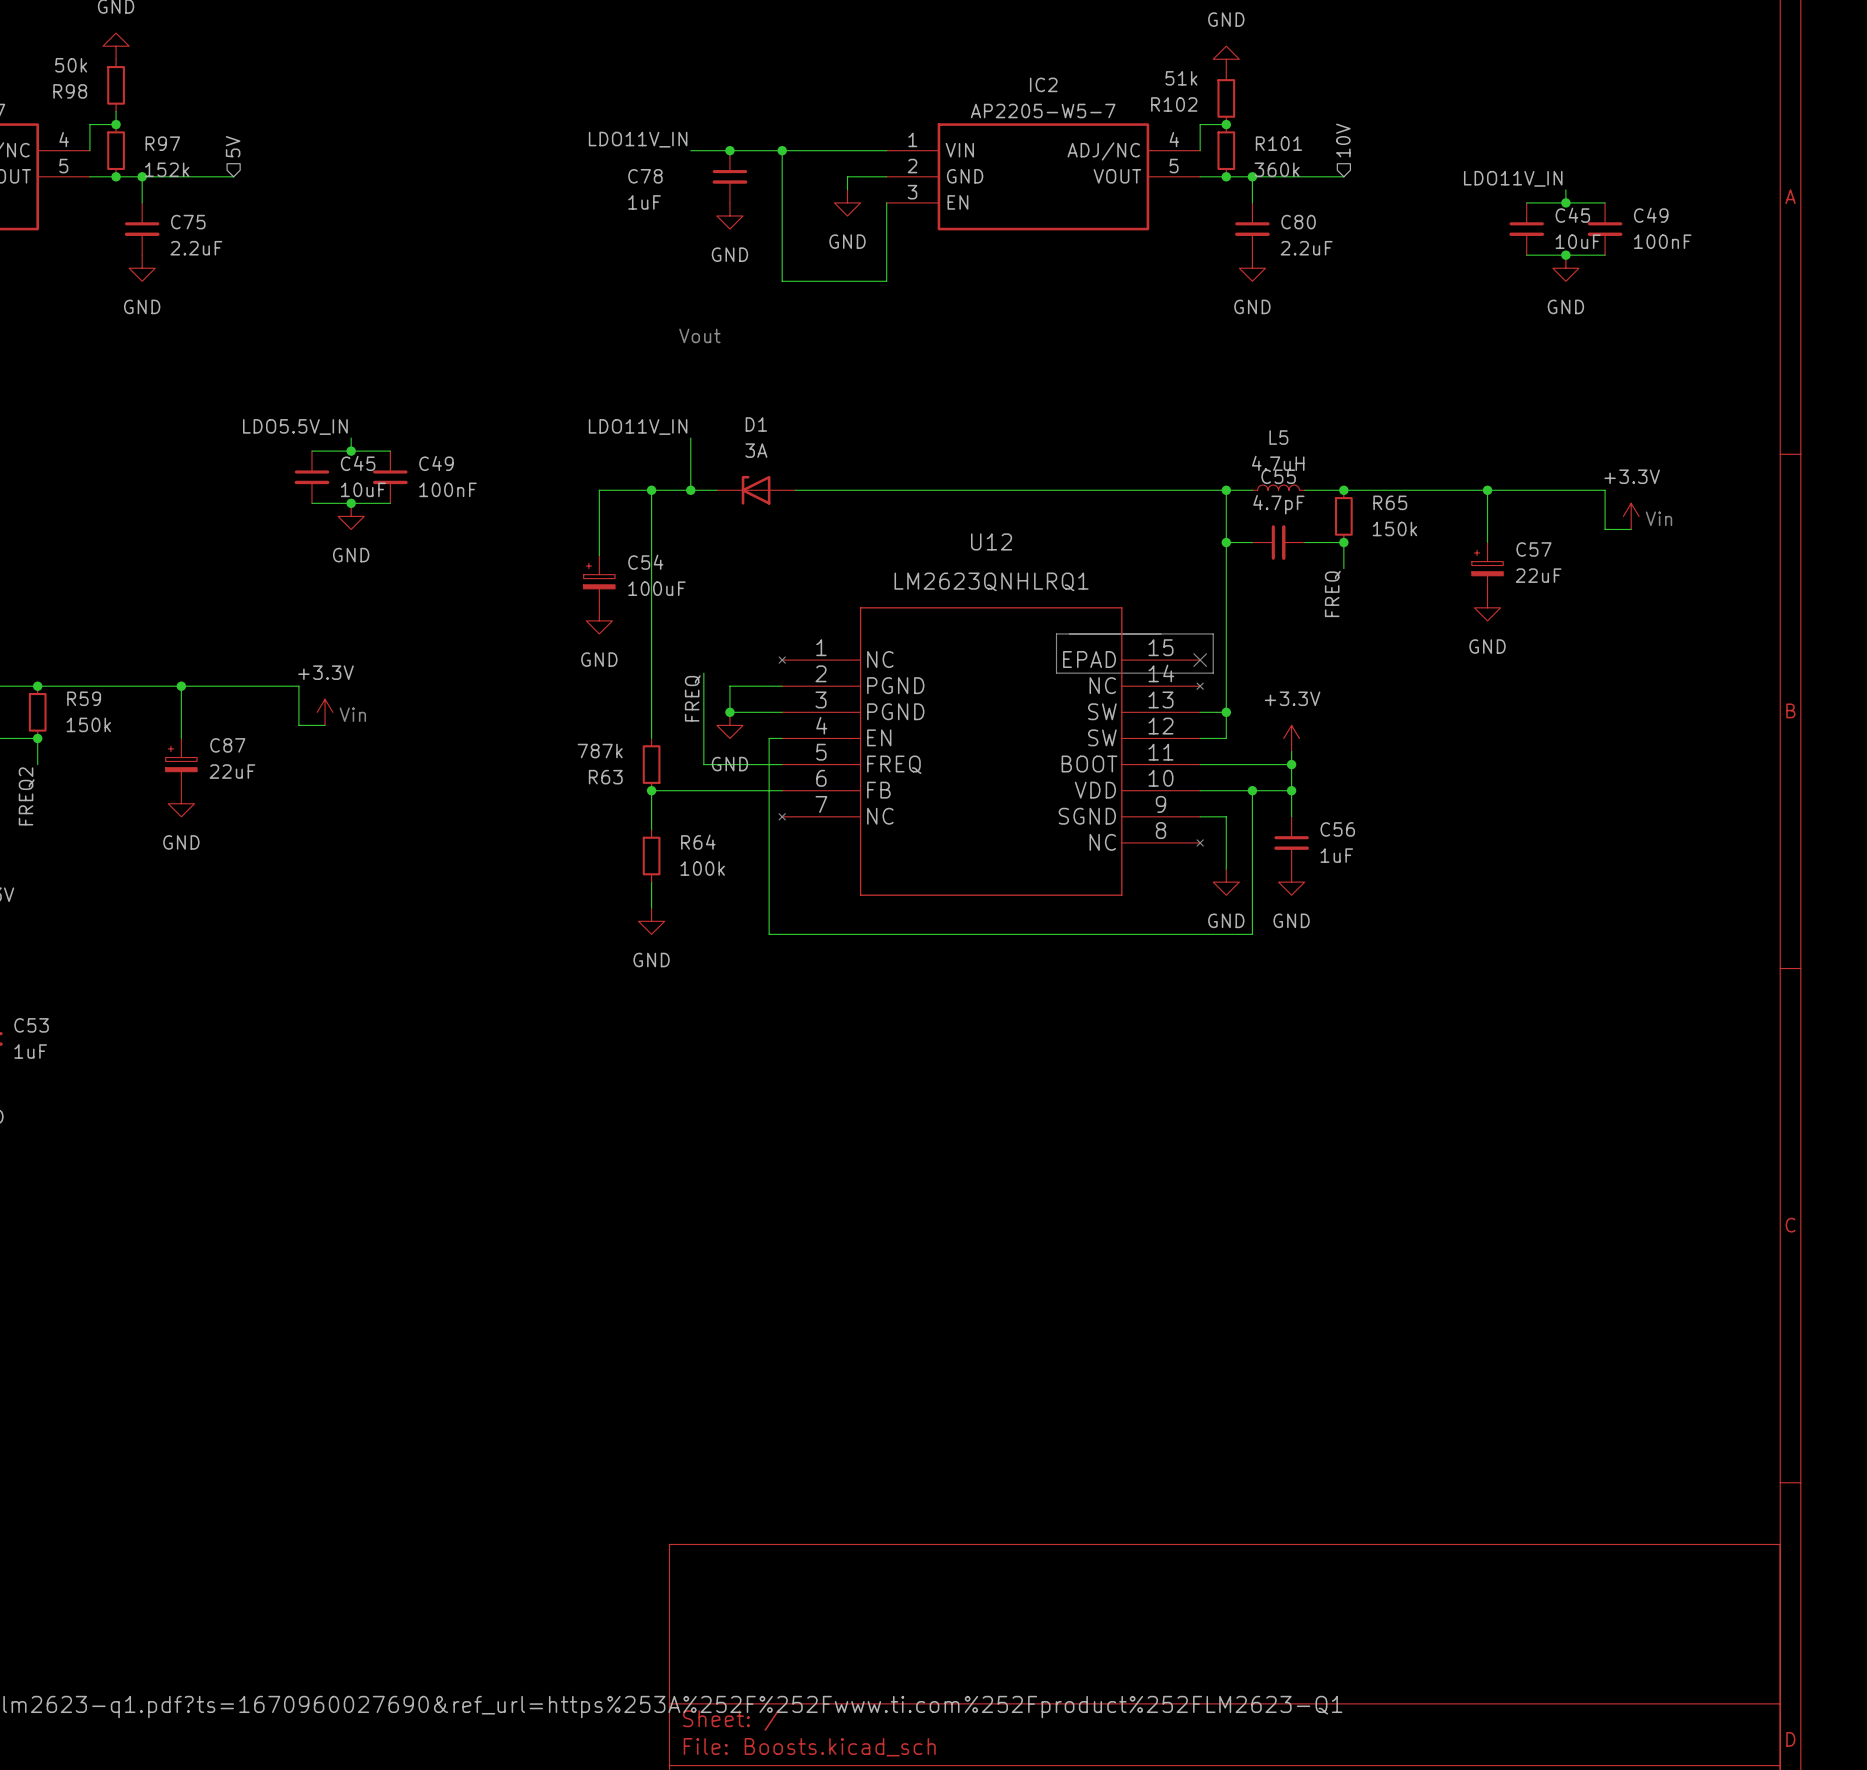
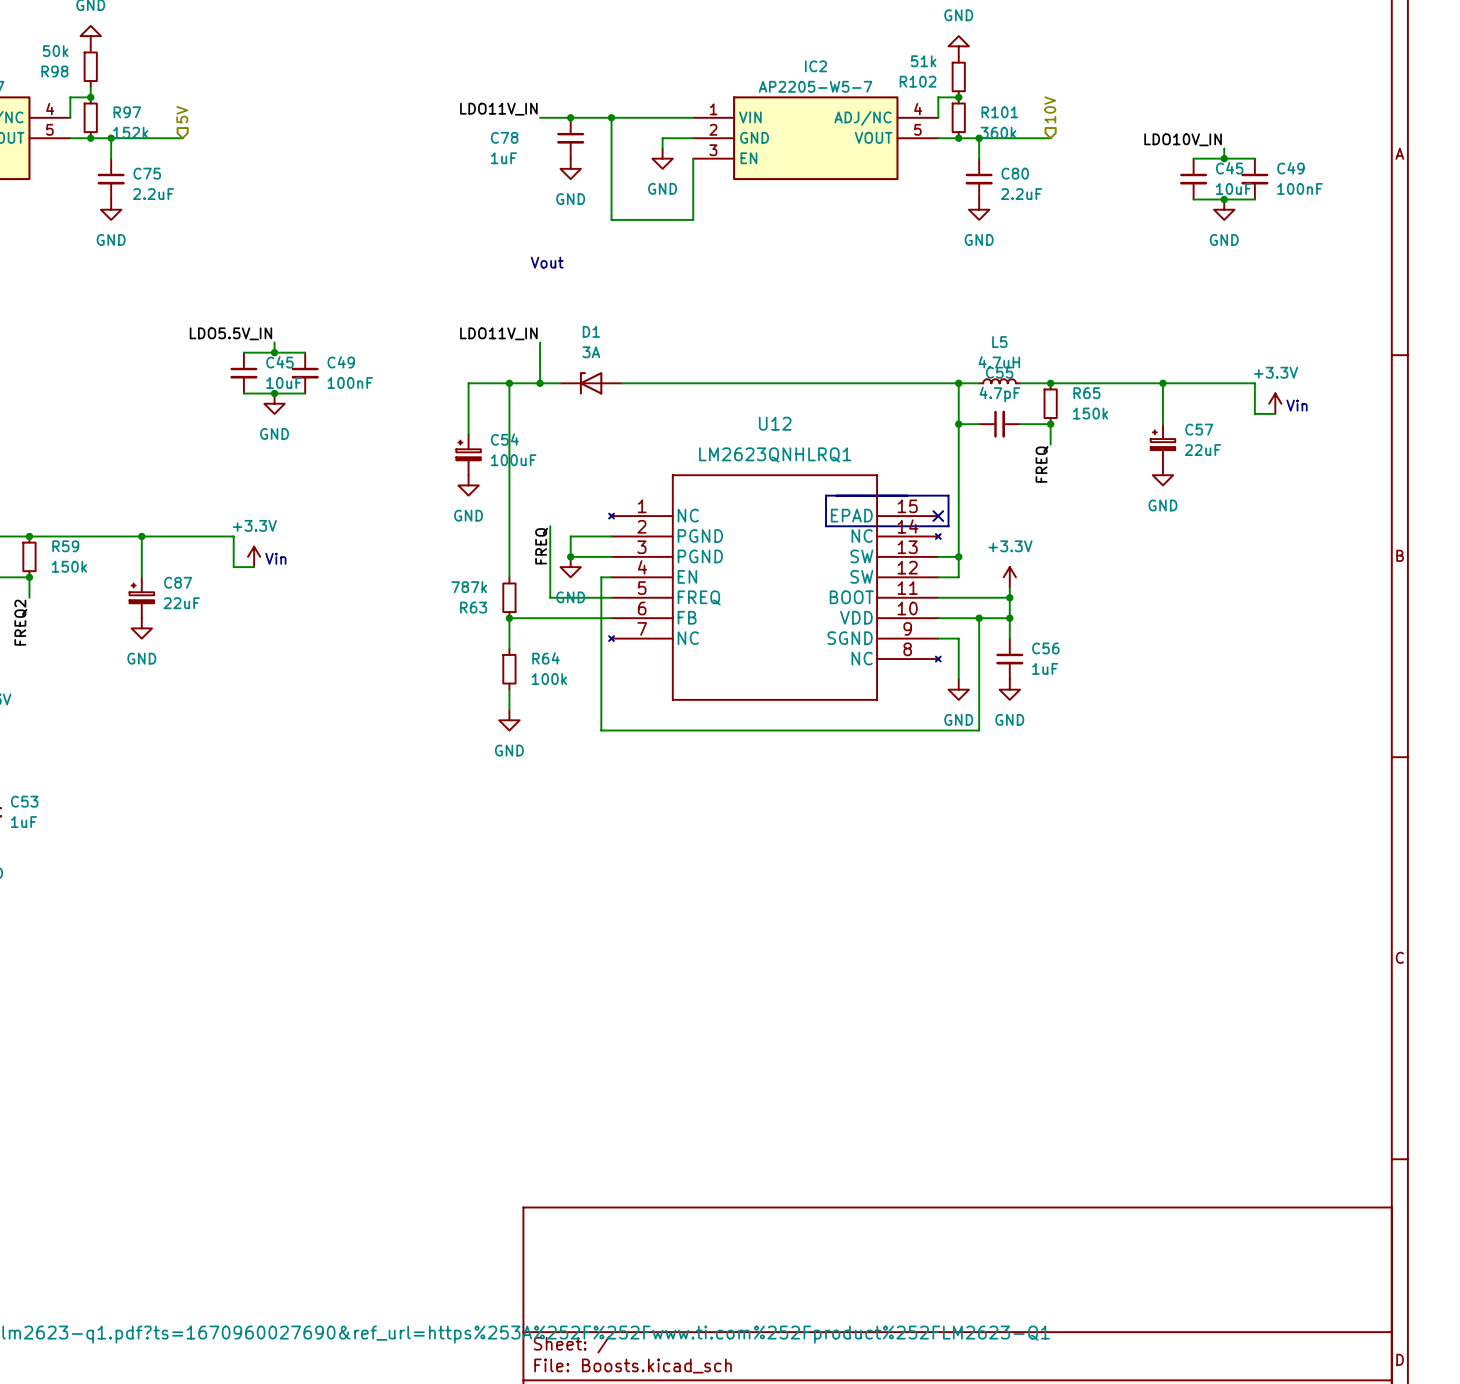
label: LDO11V_IN (1513, 178) -> LDO10V_IN (1183, 139)

